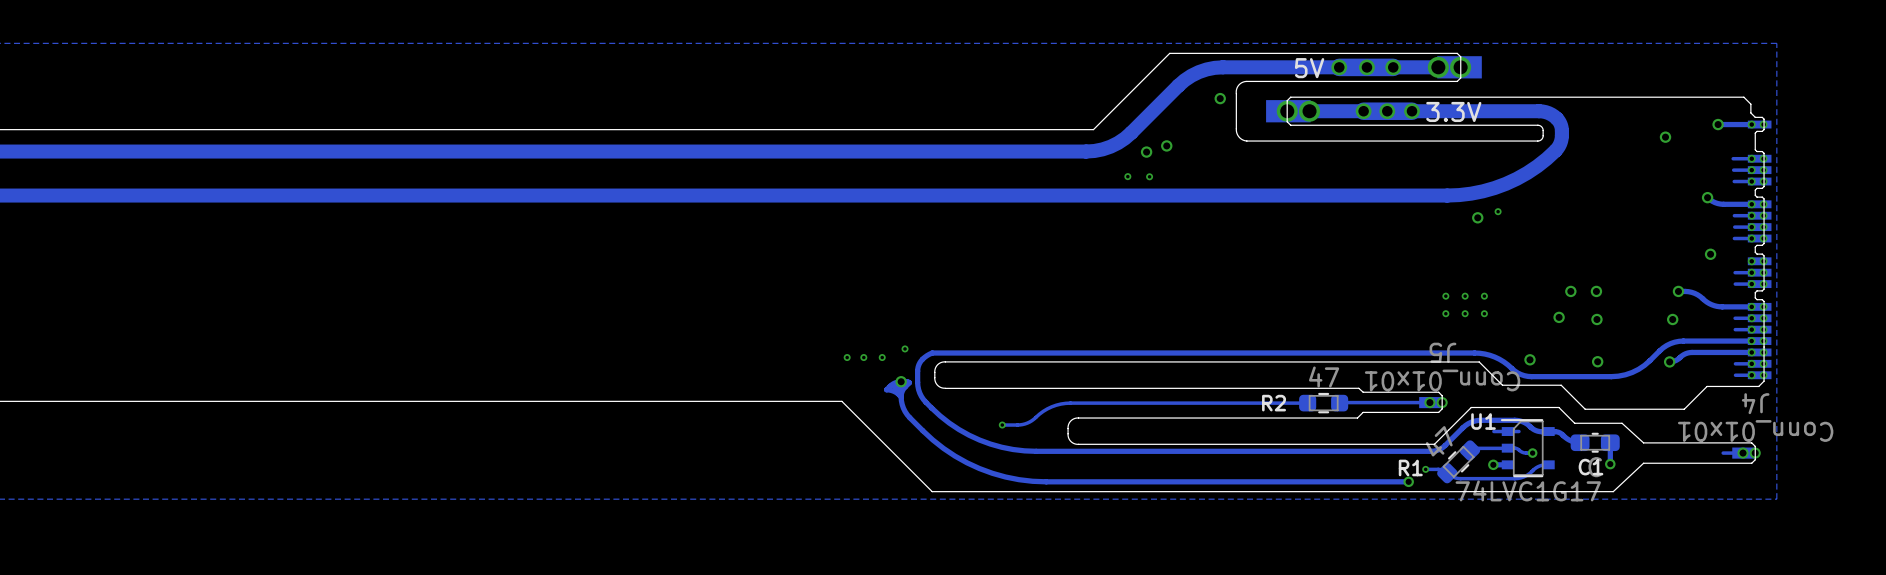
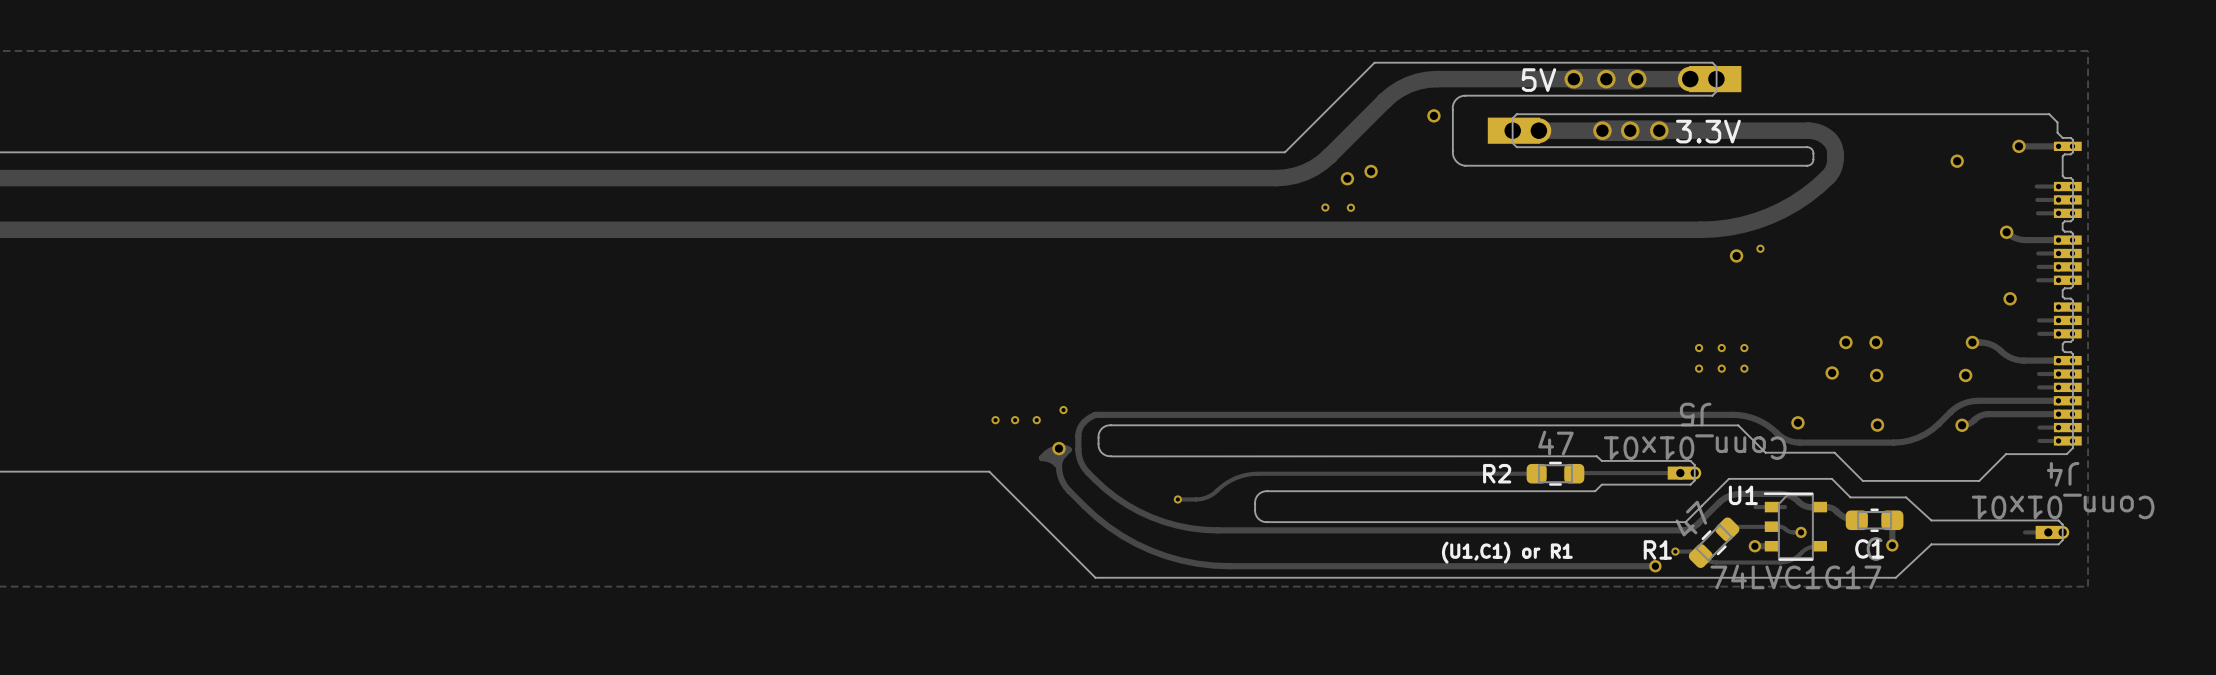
text: none -> (U1,C1) or R1 (1507, 552)

